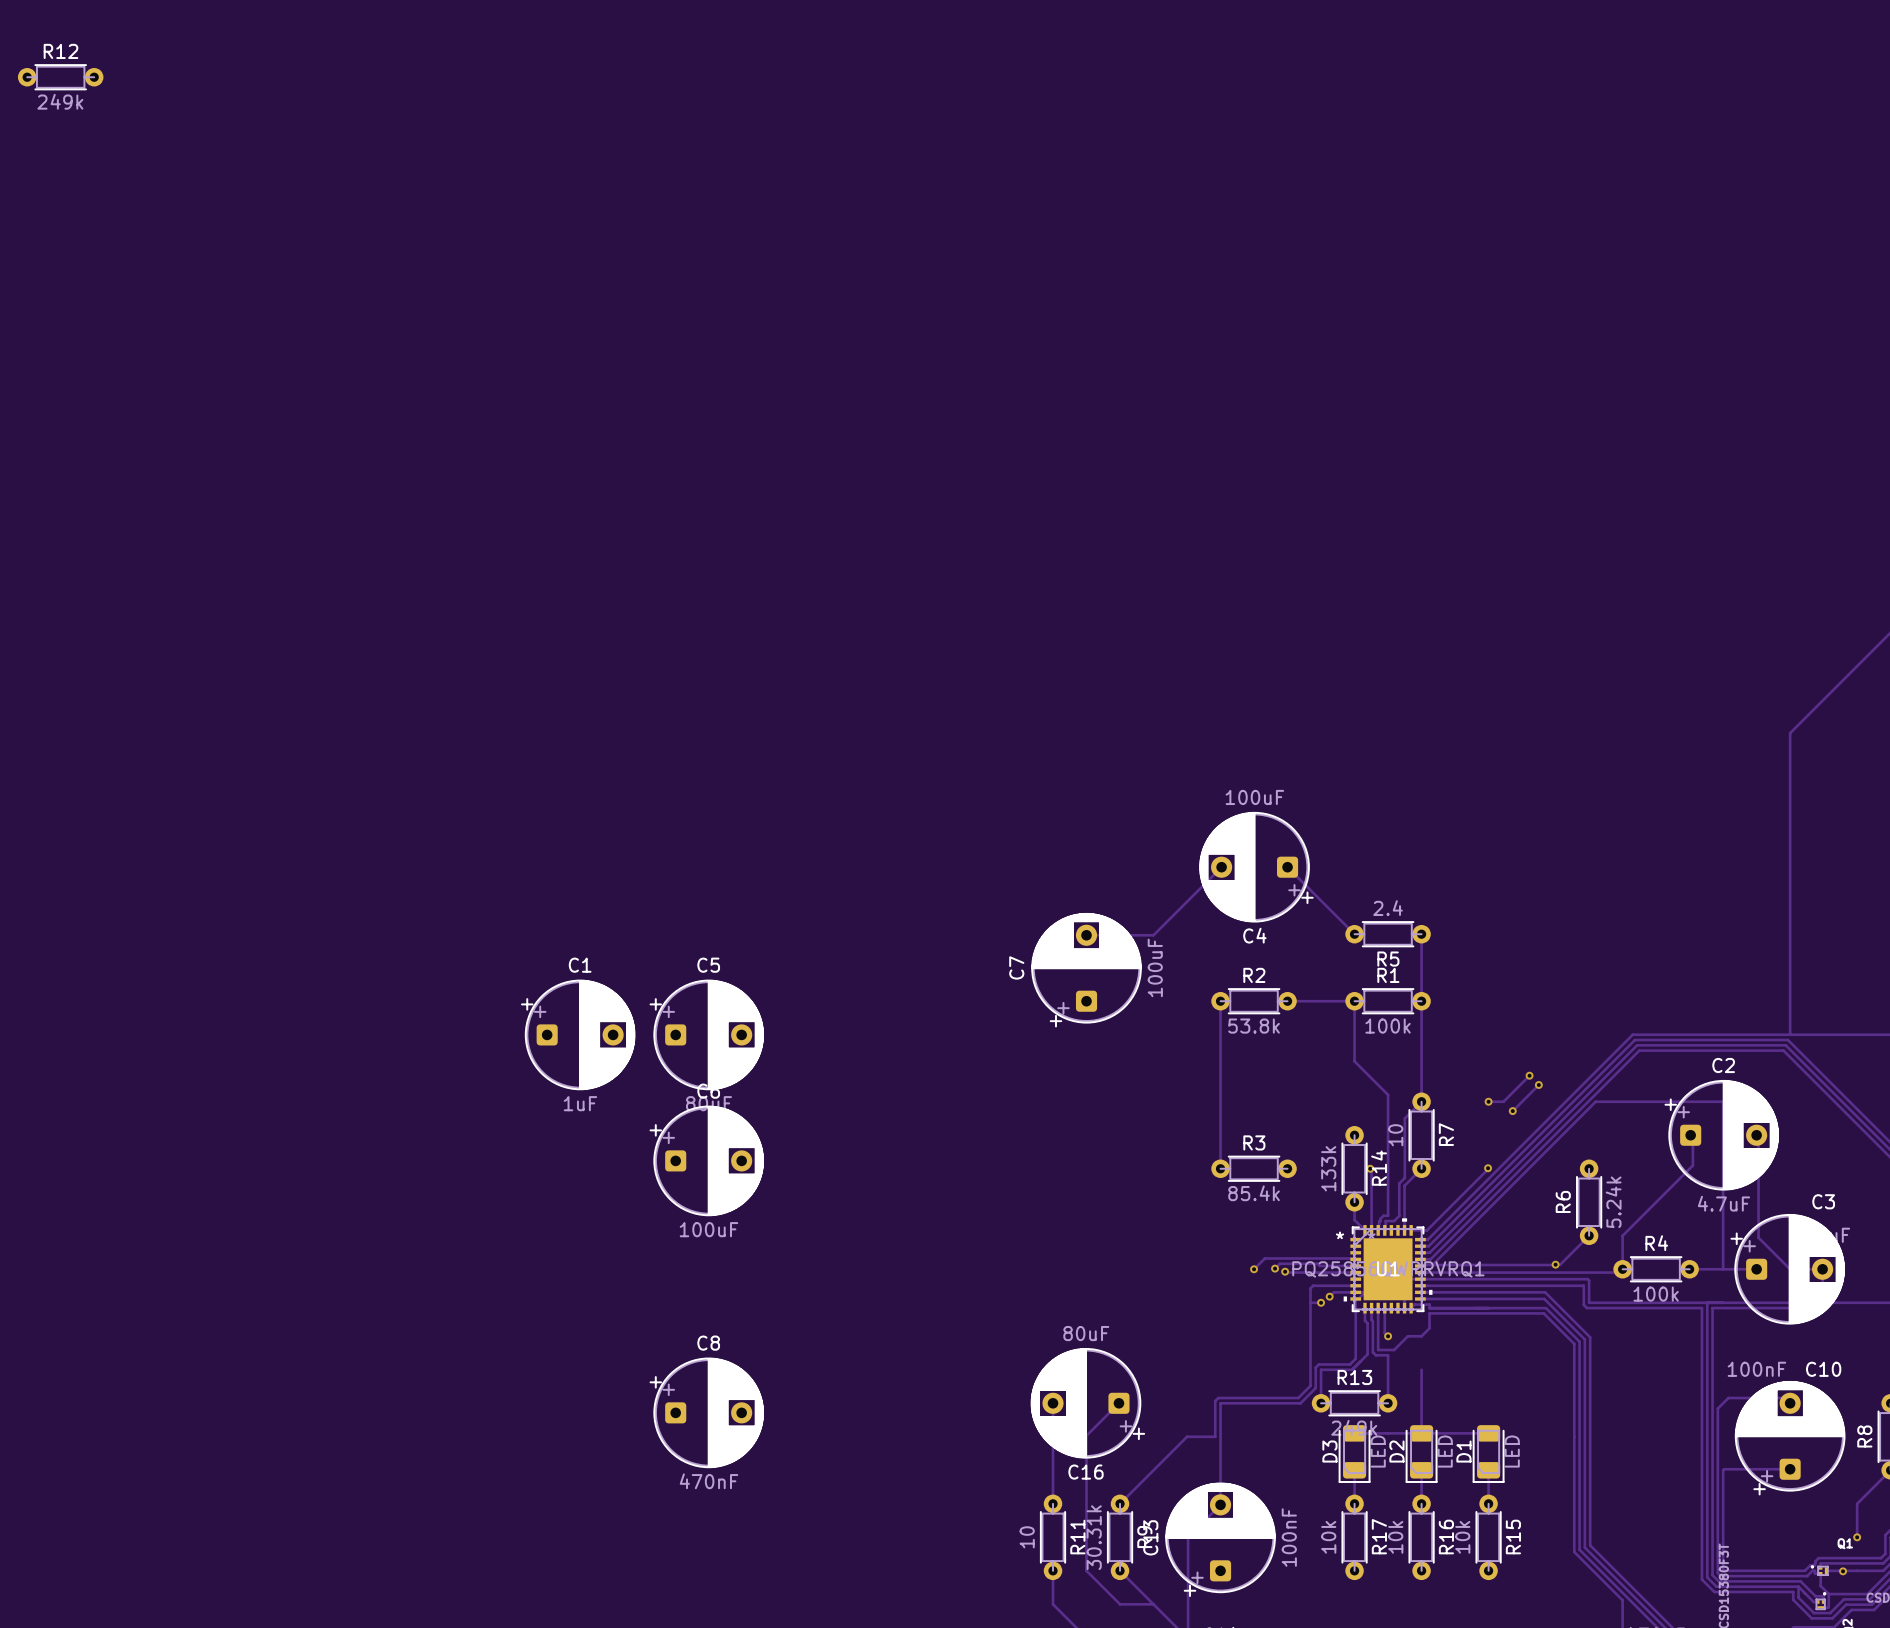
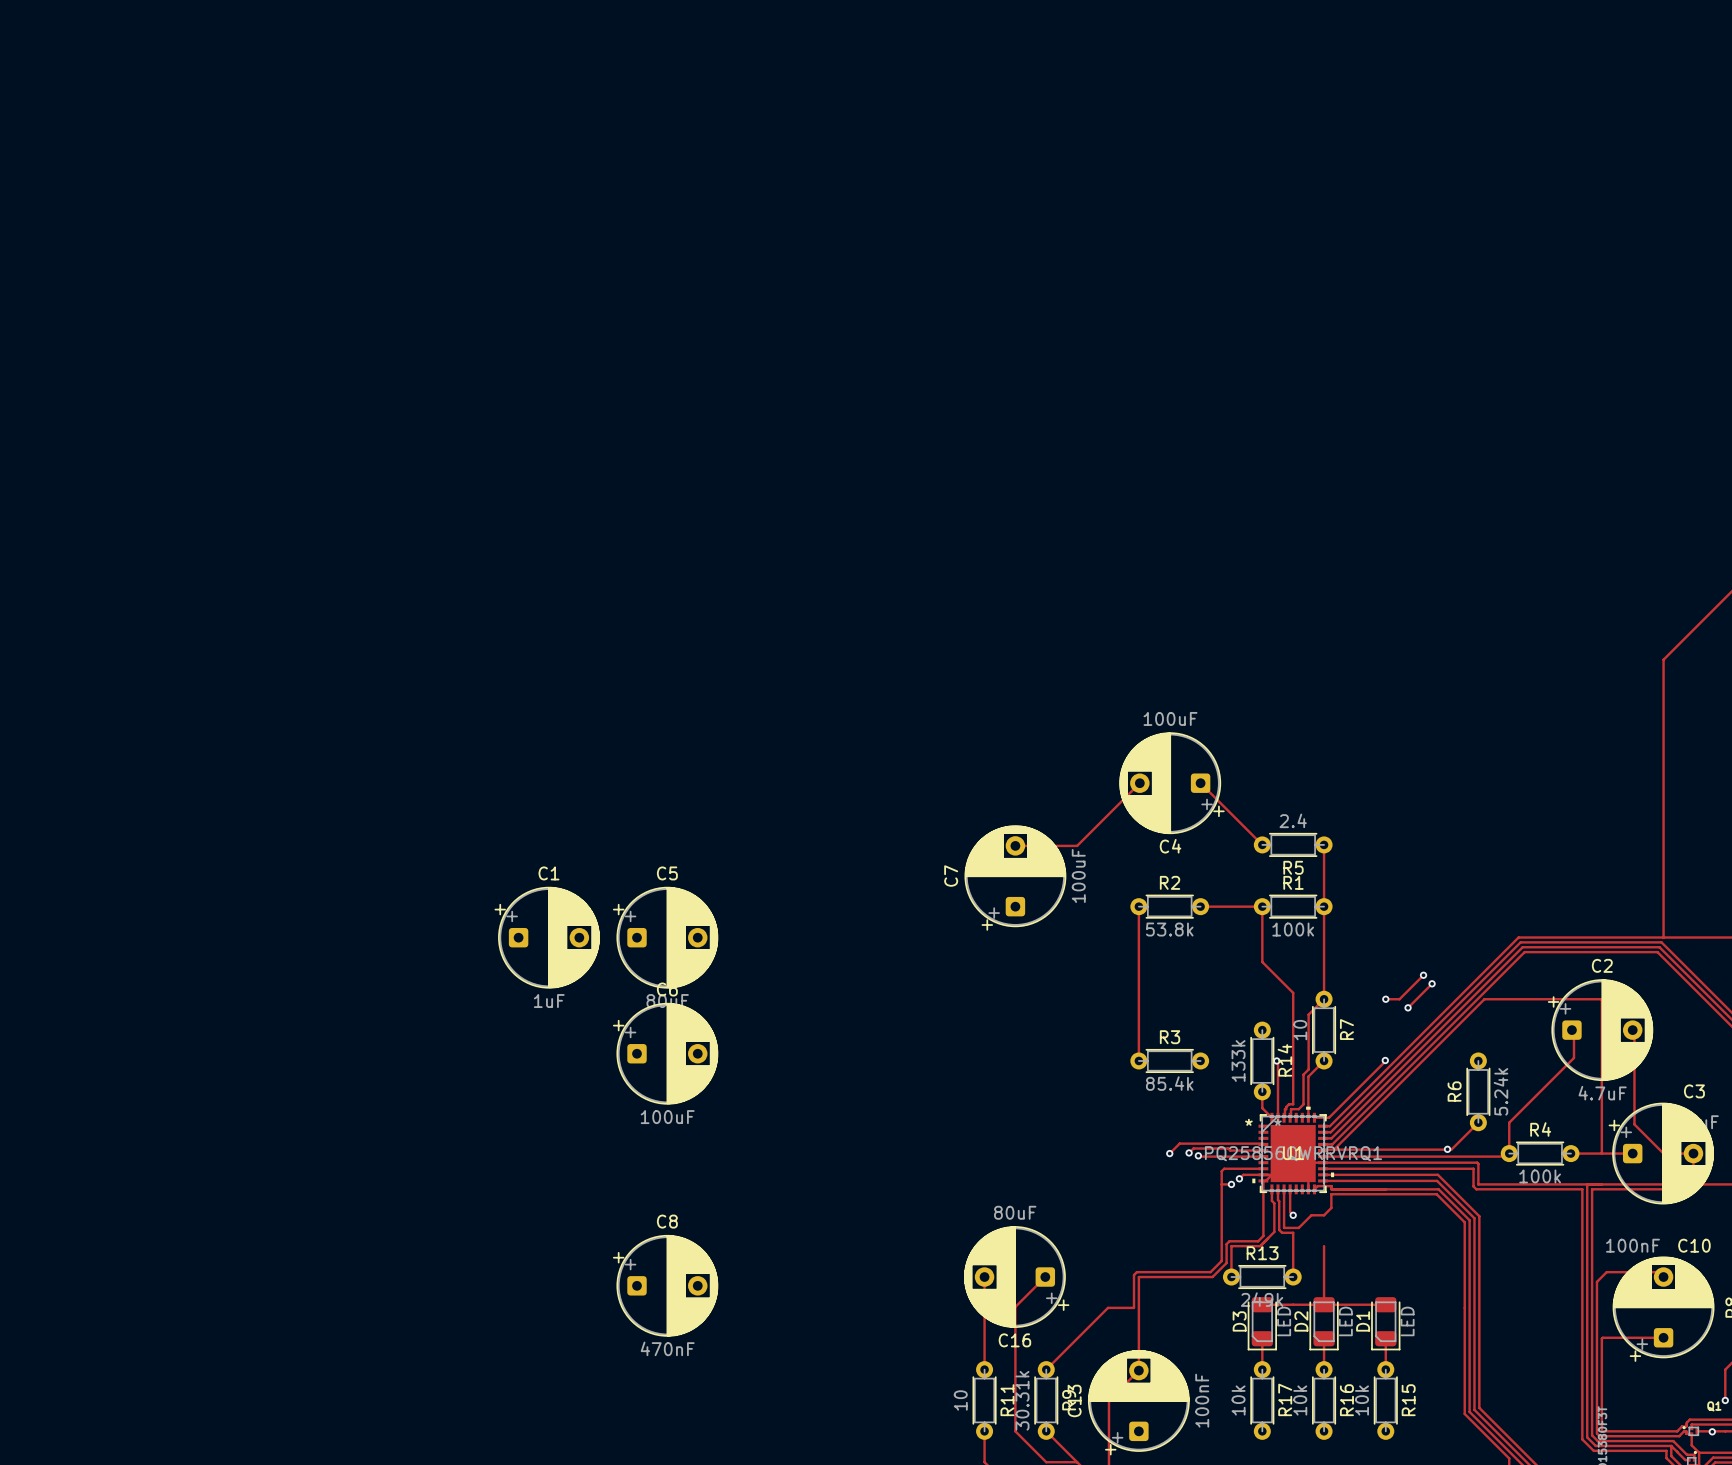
R12: 249k (60, 77) -> none

